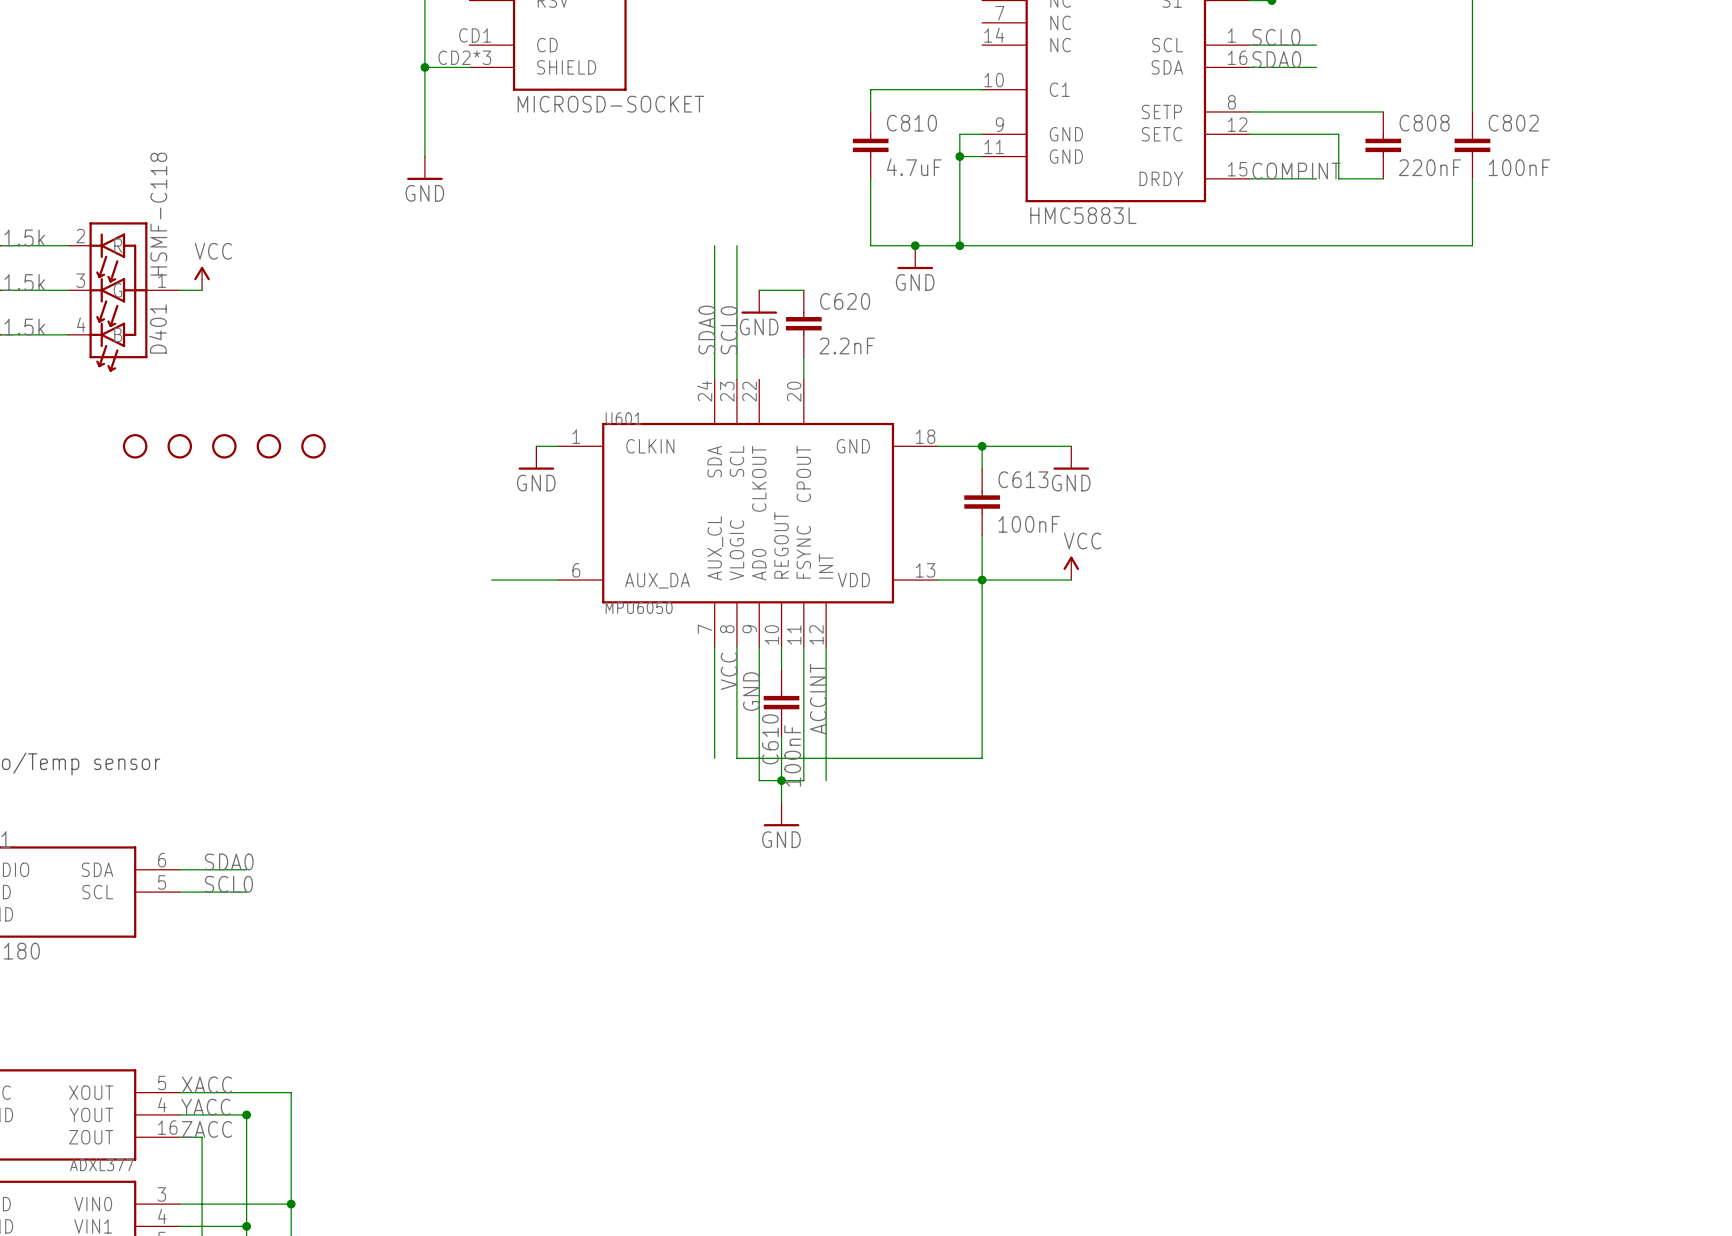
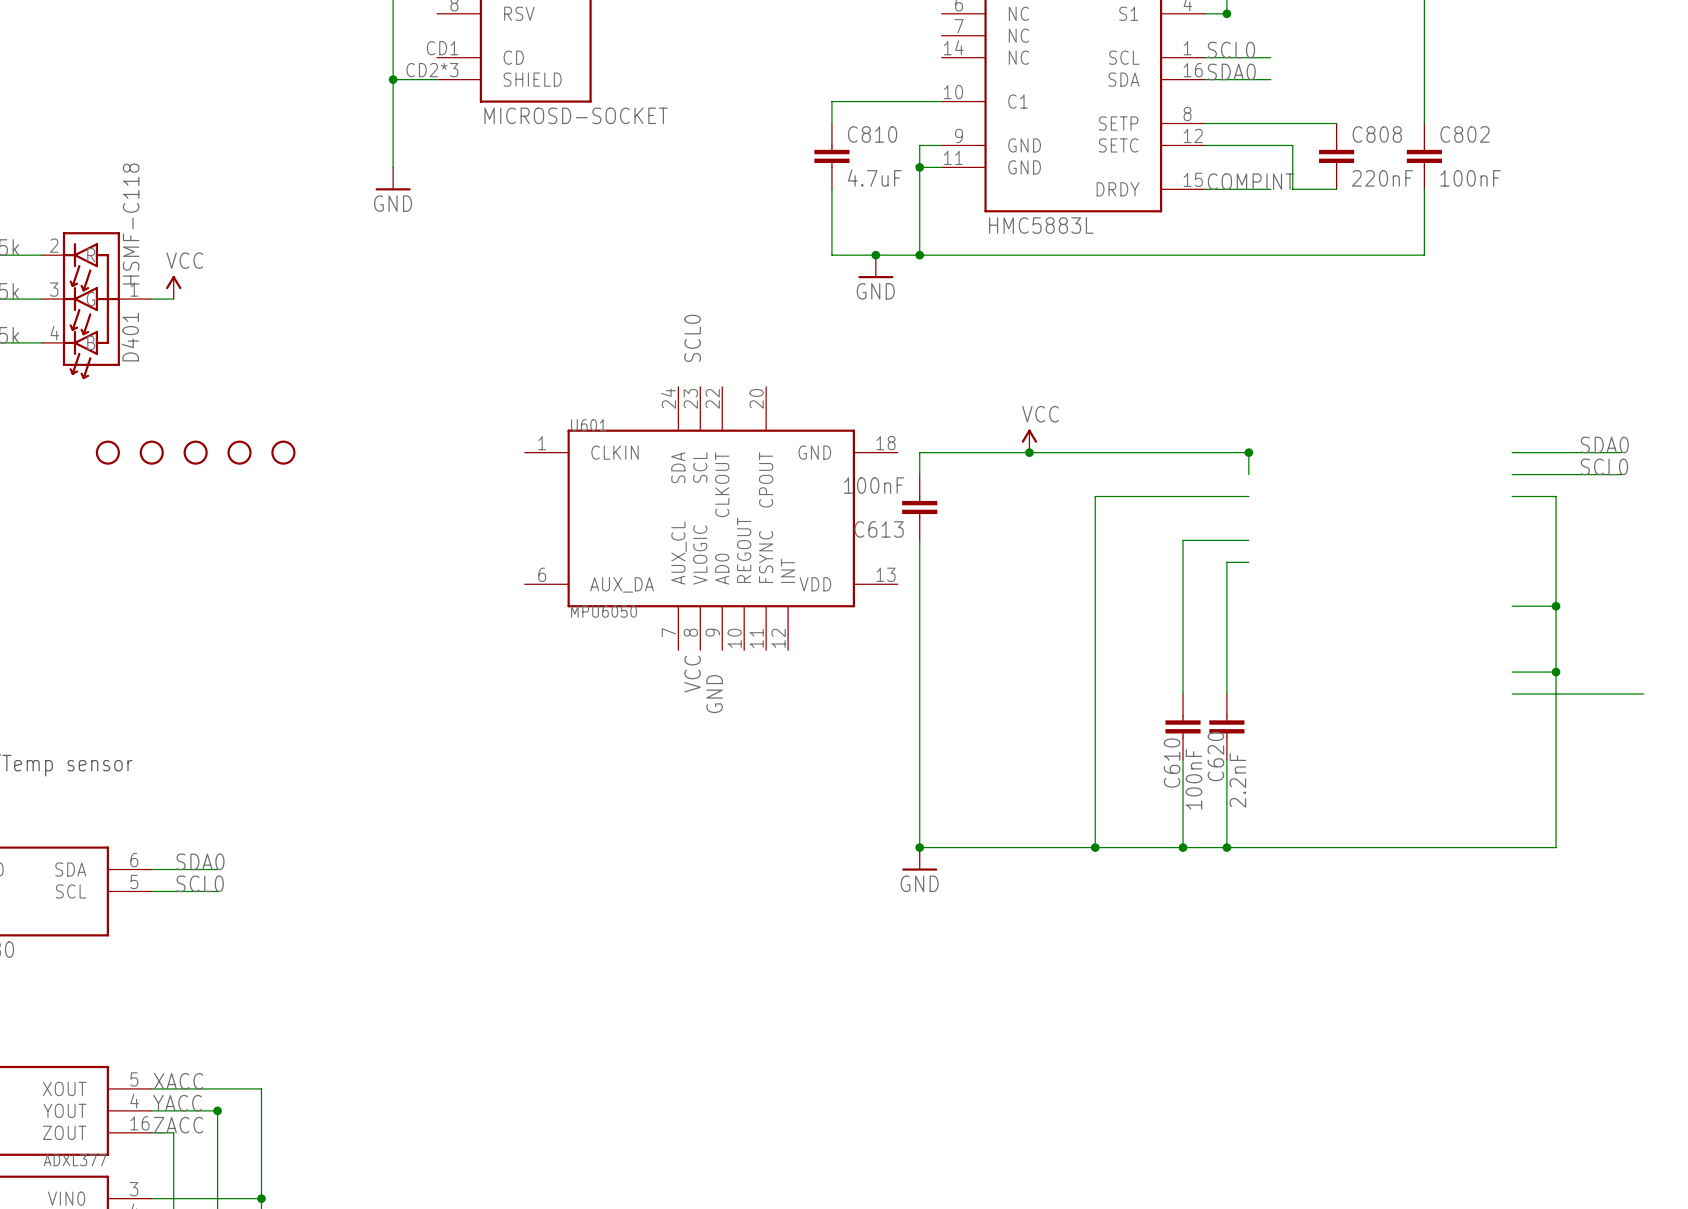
wire: (714, 245) (714, 379) -> none
wire: (736, 245) (736, 379) -> none
wire: (759, 290) (803, 290) -> none
power symbol: GND (759, 301) -> none
C620 name rotation: 0° (845, 301) -> 90° counterclockwise (1215, 756)
C620 name position: C620 (845, 301) -> C620 (1215, 756)
C620 position: (803, 323) -> (1226, 726)
label: SDA0 (706, 329) -> none
C620 value rotation: 0° (847, 346) -> 90° counterclockwise (1237, 780)
wire: (803, 357) (803, 379) -> none
label: none -> SDA0 (1604, 444)
wire: (536, 446) (558, 446) -> none
wire: (937, 446) (959, 446) -> (919, 474) (919, 452)
wire: (982, 446) (982, 468) -> none
junction: (982, 446) -> none
wire: none -> (1029, 452) (1248, 452) (1248, 474)
junction: none -> (1029, 452)
junction: none -> (1248, 452)
wire: none -> (1512, 452) (1621, 452)
power symbol: GND (536, 458) -> none
power symbol: GND (1071, 458) -> none
label: none -> SCL0 (1604, 466)
wire: none -> (1512, 474) (1621, 474)
C613 name position: C613 (1023, 479) -> C613 (879, 529)
wire: none -> (1248, 496) (1095, 496) (1095, 847)
wire: none -> (1512, 496) (1556, 496) (1556, 847) (919, 847) (919, 540)
C613 position: (982, 502) -> (919, 507)
C613 value position: 100nF (1029, 524) -> 100nF (874, 485)
wire: (982, 535) (982, 758) (736, 758) (736, 646) -> none
wire: none -> (1248, 540) (1183, 540) (1183, 693)
wire: none -> (1248, 562) (1226, 562) (1226, 693)
power symbol position: VCC (1071, 568) -> VCC (1029, 441)
wire: (491, 580) (558, 580) -> none
wire: (937, 580) (1071, 580) -> none
junction: (982, 580) -> none
wire: none -> (1512, 606) (1556, 606)
junction: none -> (1556, 606)
wire: (714, 646) (714, 758) -> none
wire: (759, 646) (759, 780) (803, 780) (803, 646) -> none
wire: (781, 646) (781, 669) -> none
wire: (826, 646) (826, 780) -> none
wire: none -> (1512, 672) (1556, 672)
junction: none -> (1556, 672)
wire: none -> (1512, 693) (1643, 693)
label: ACCINT (818, 699) -> none
C610 position: (781, 702) -> (1183, 726)
wire: (781, 736) (781, 802) -> none
wire: none -> (1183, 759) (1183, 847)
wire: none -> (1226, 759) (1226, 847)
junction: (781, 780) -> none
power symbol position: GND (781, 814) -> GND (919, 859)
junction: none -> (919, 847)
junction: none -> (1095, 847)
junction: none -> (1183, 847)
junction: none -> (1226, 847)

